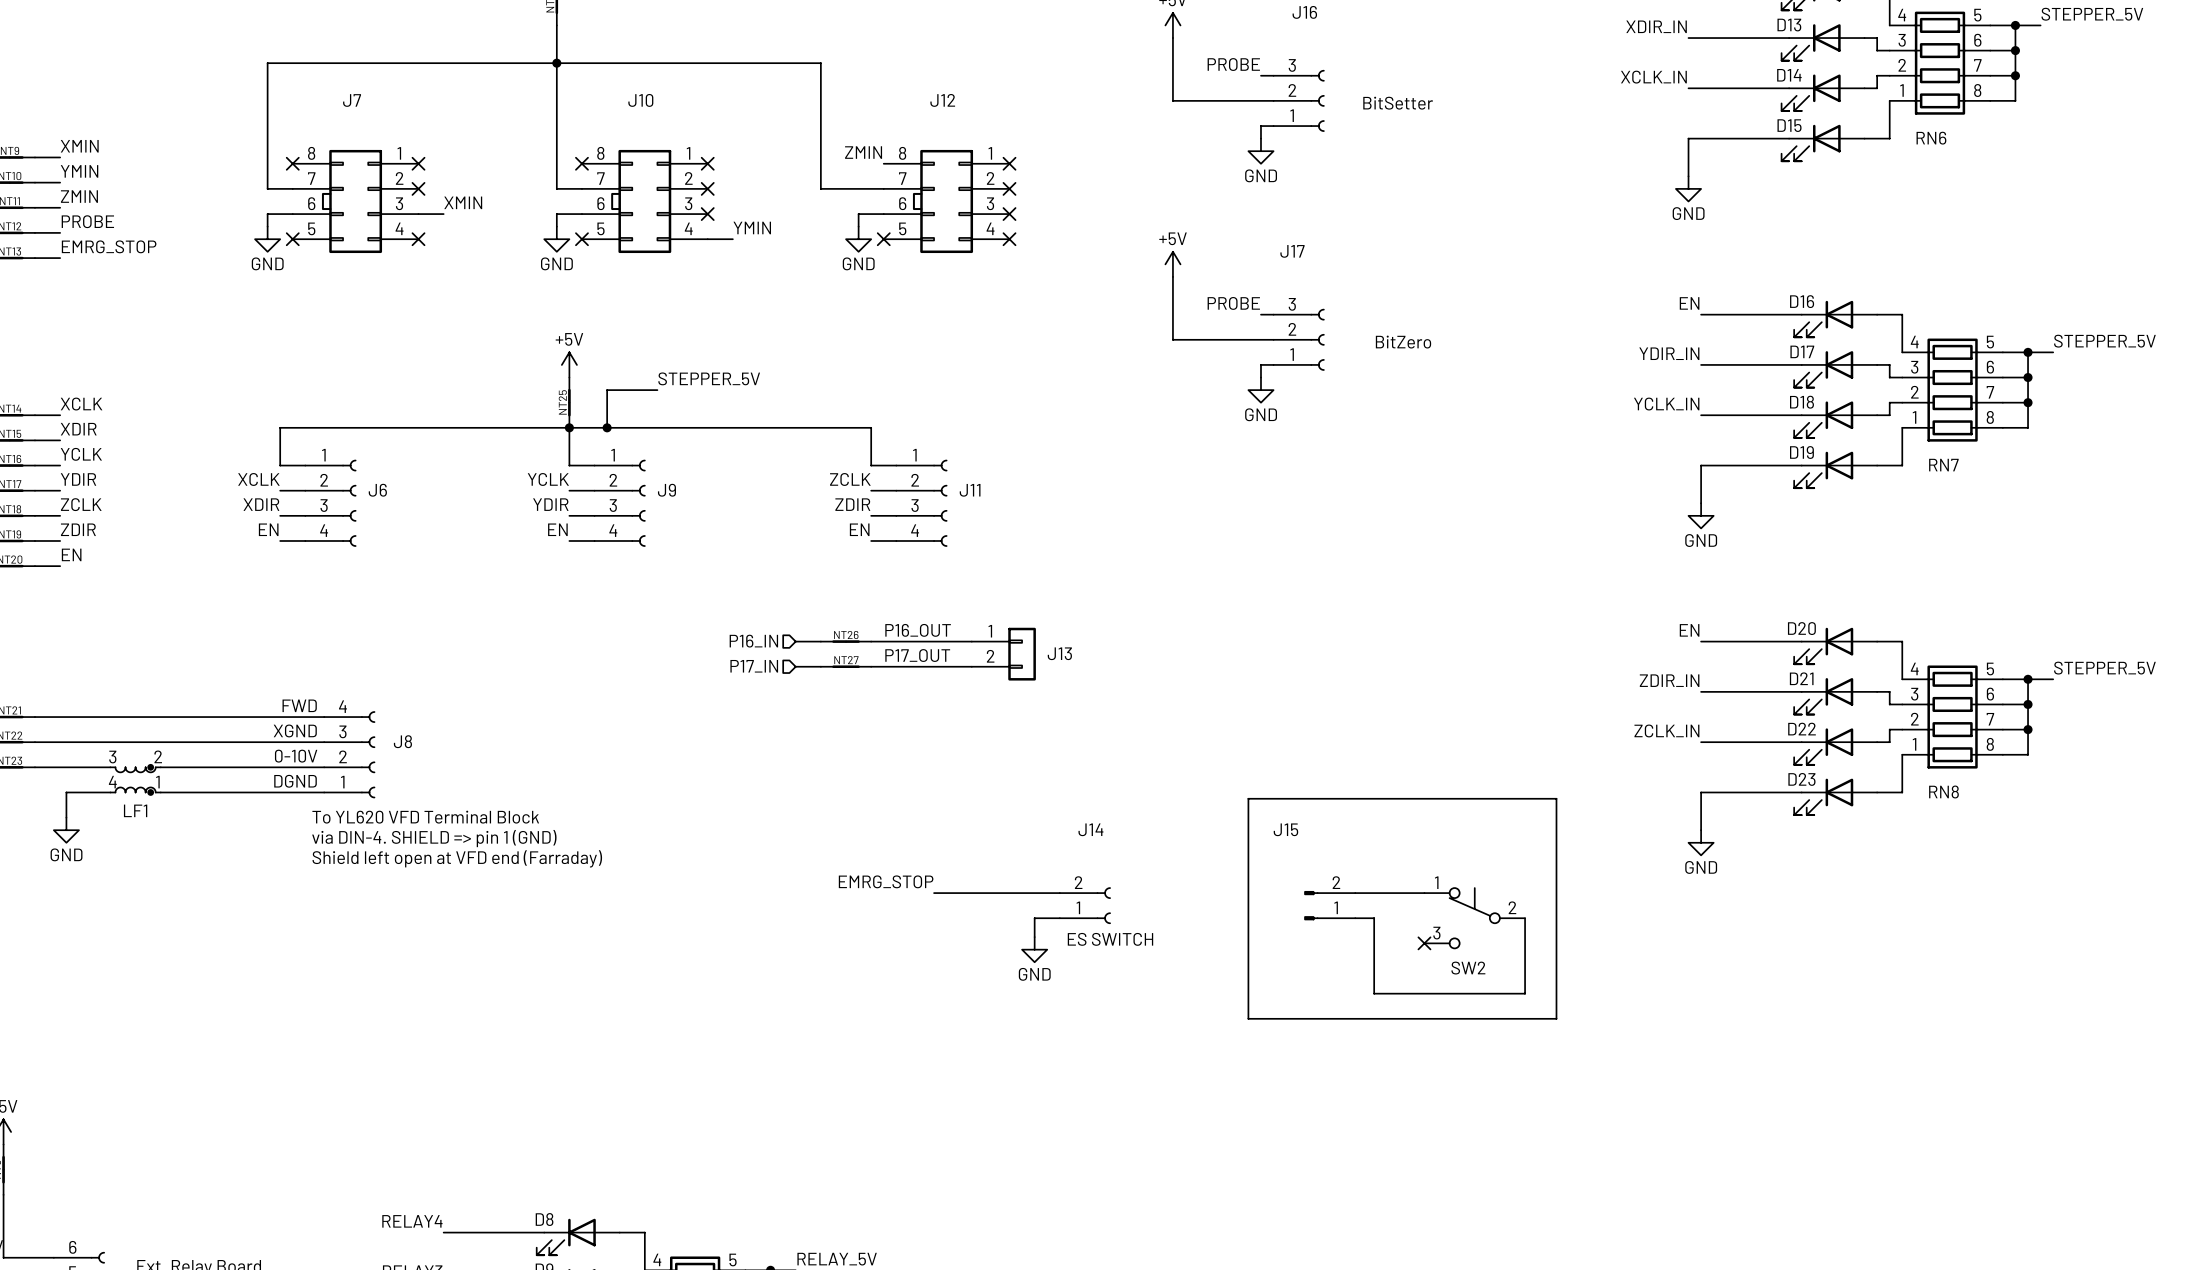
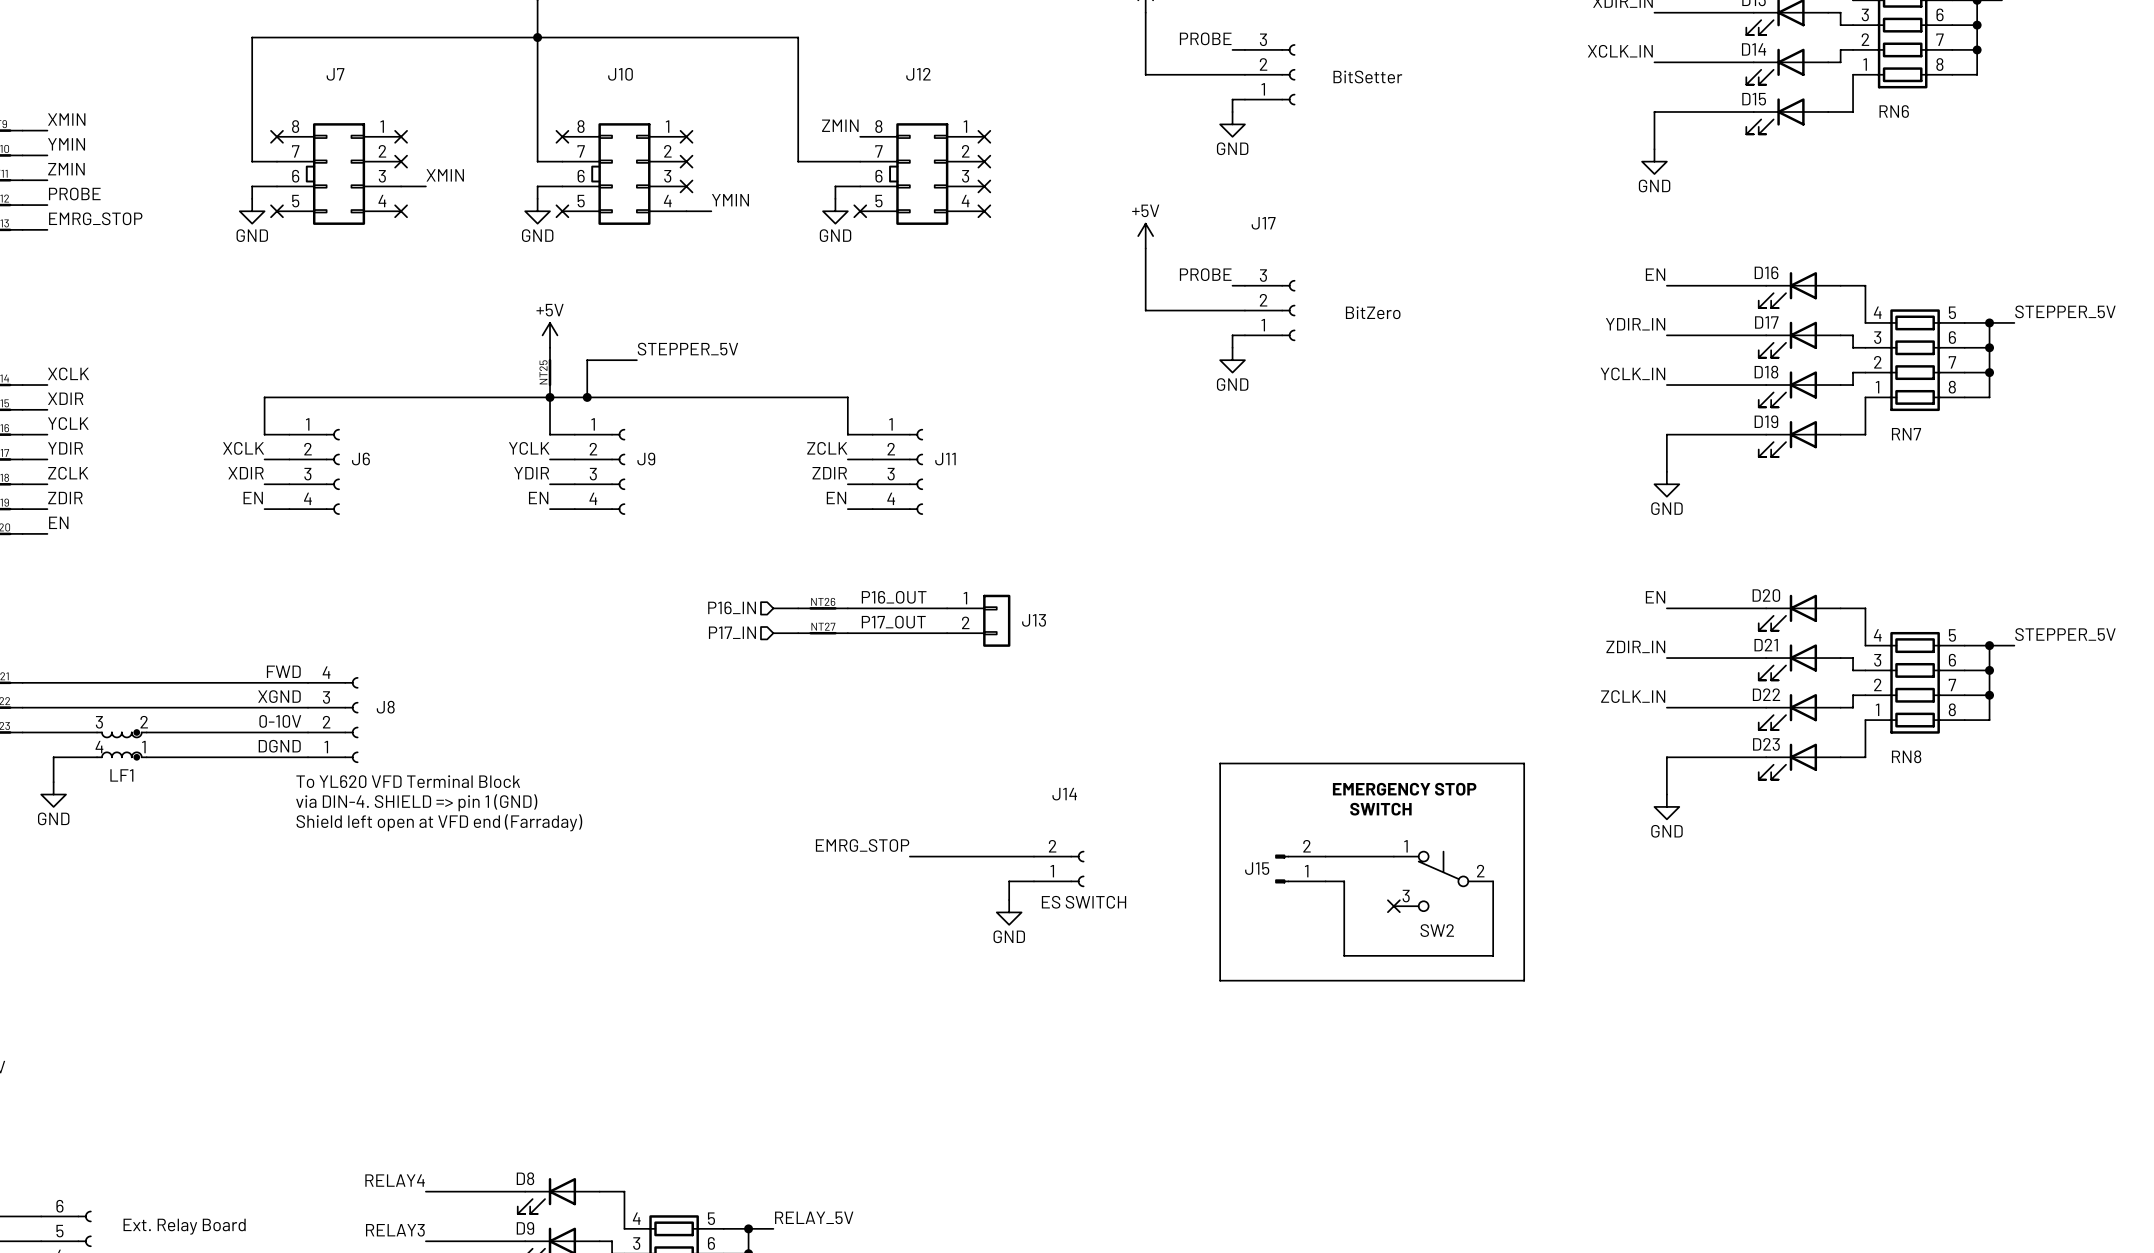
text: none -> EMERGENCY STOP (1404, 789)
J15 name position: J15 (1285, 829) -> J15 (1257, 868)
text: none -> SWITCH (1380, 809)

